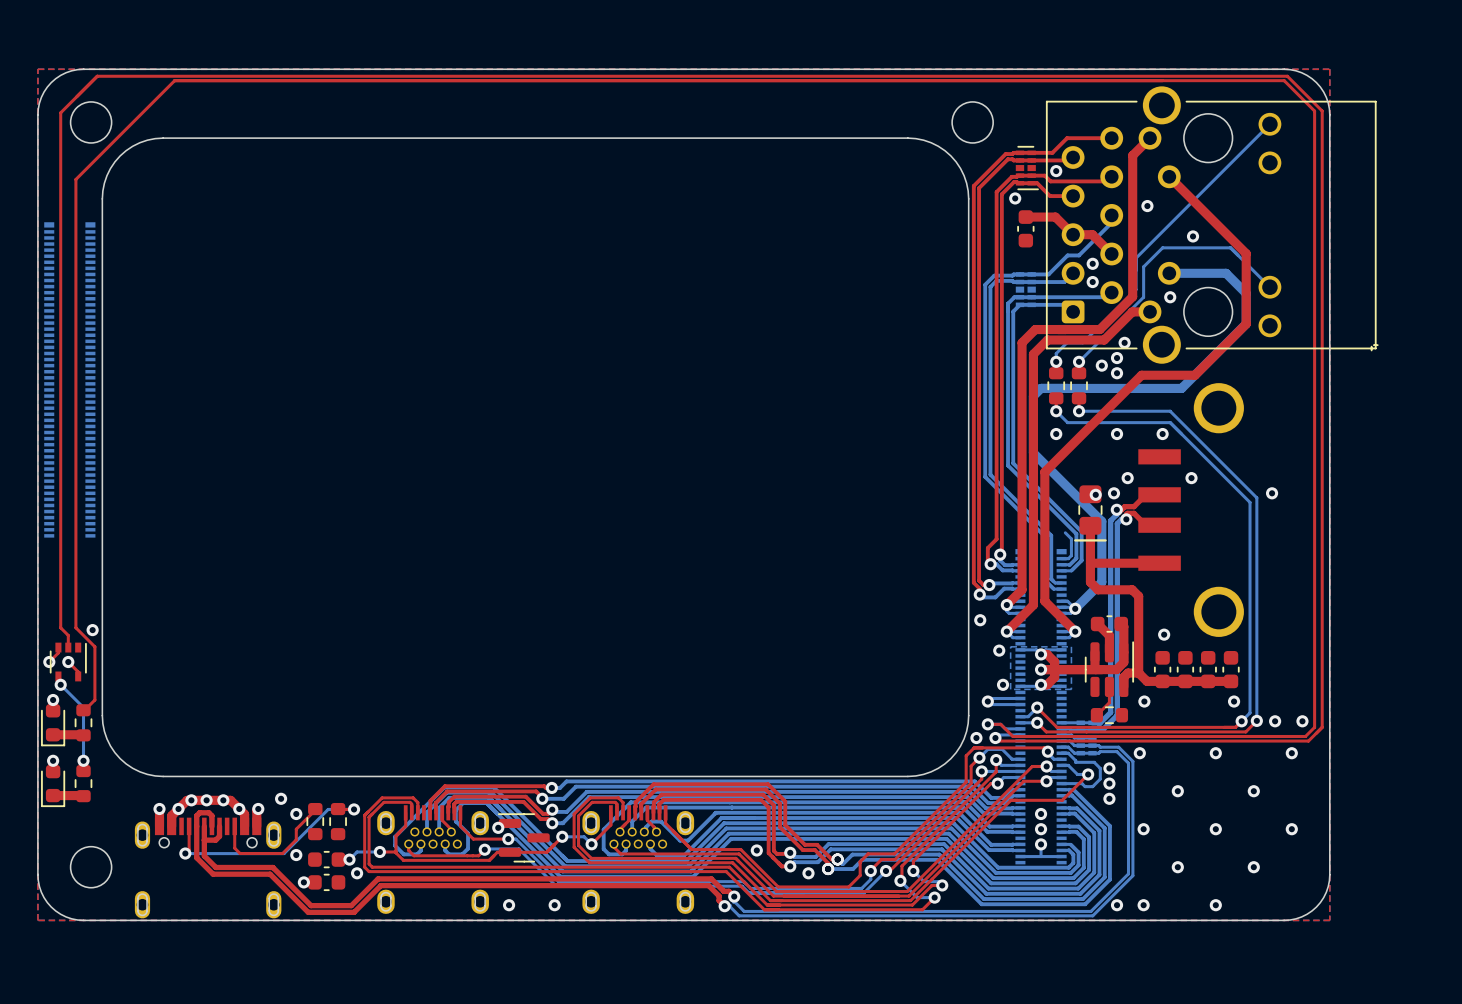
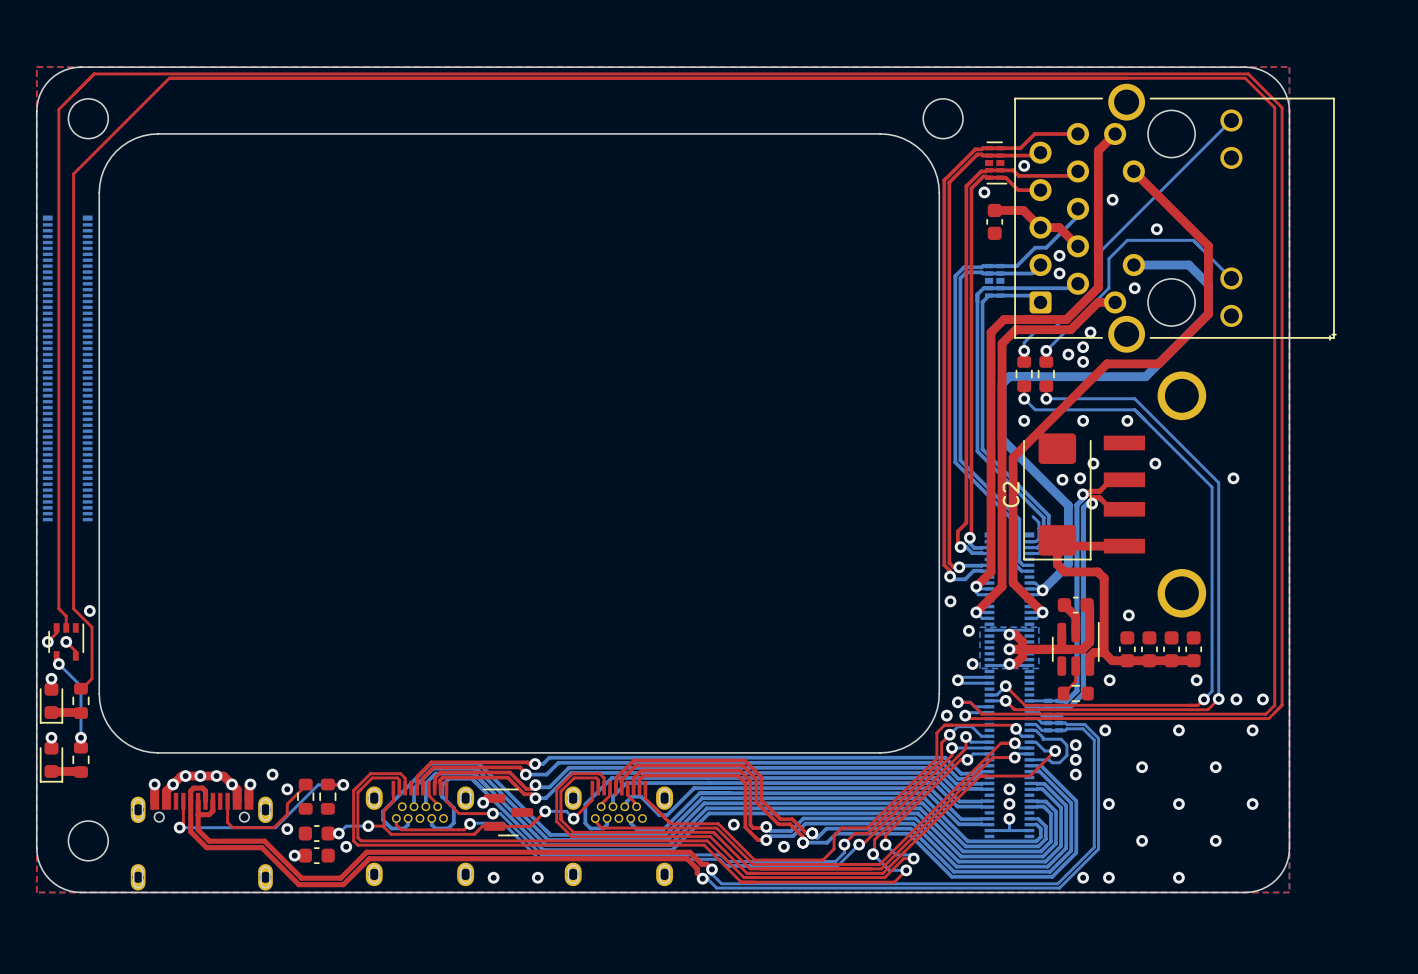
part: (1090, 510) -> none
C2: none -> (1057, 496)
top track: (1090, 525) (1090, 563) -> none
line: (1075, 540) (1105, 540) -> none

